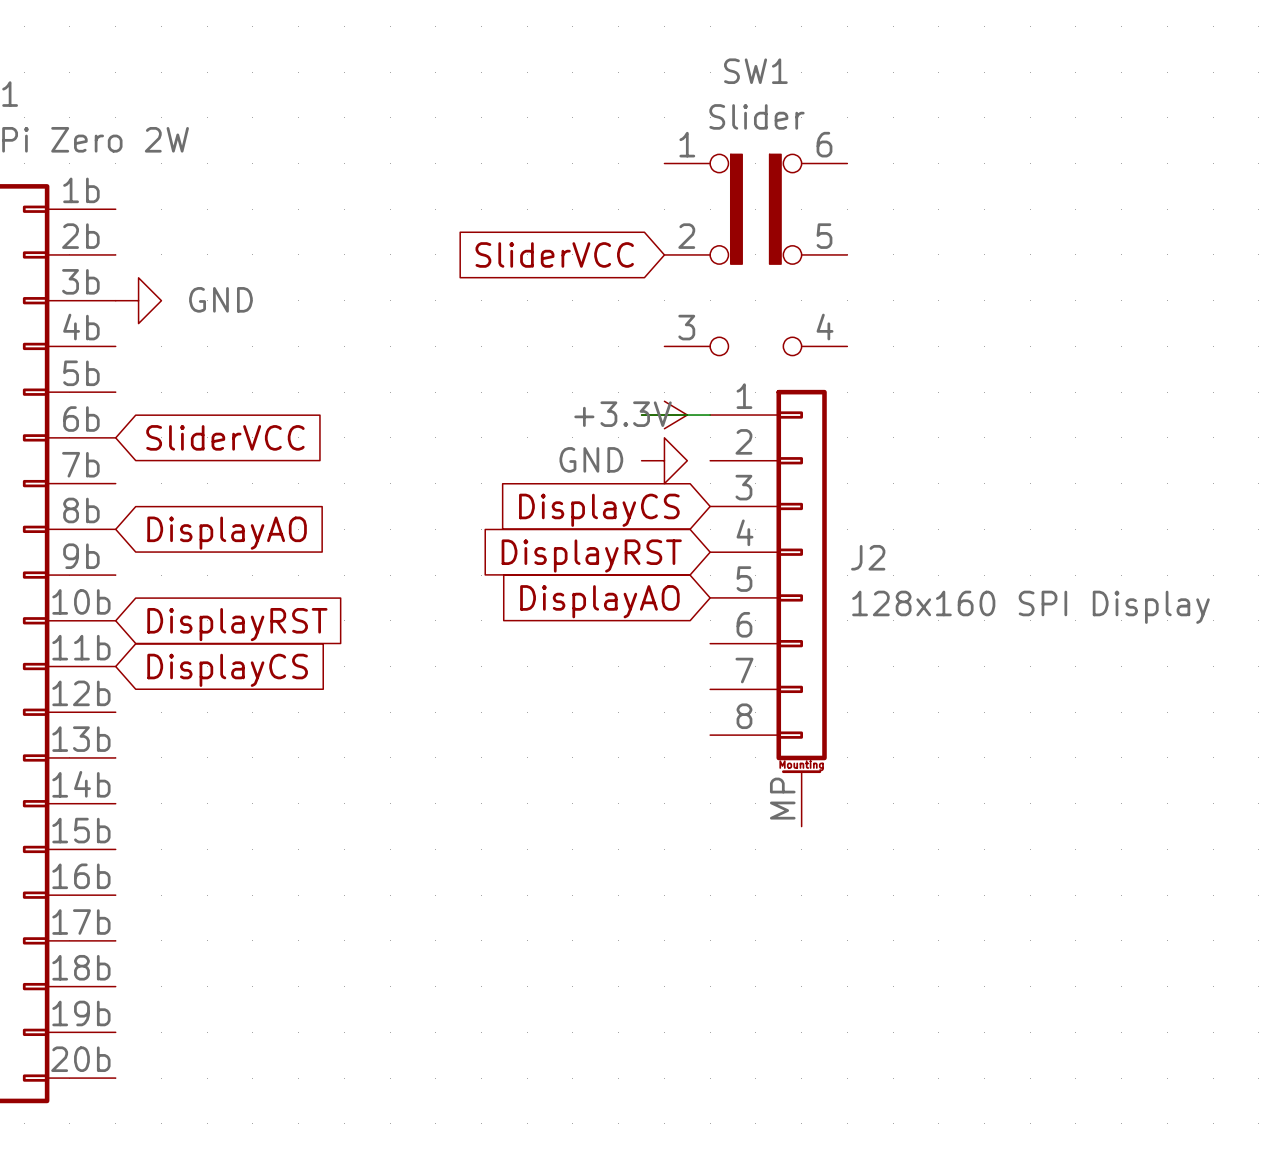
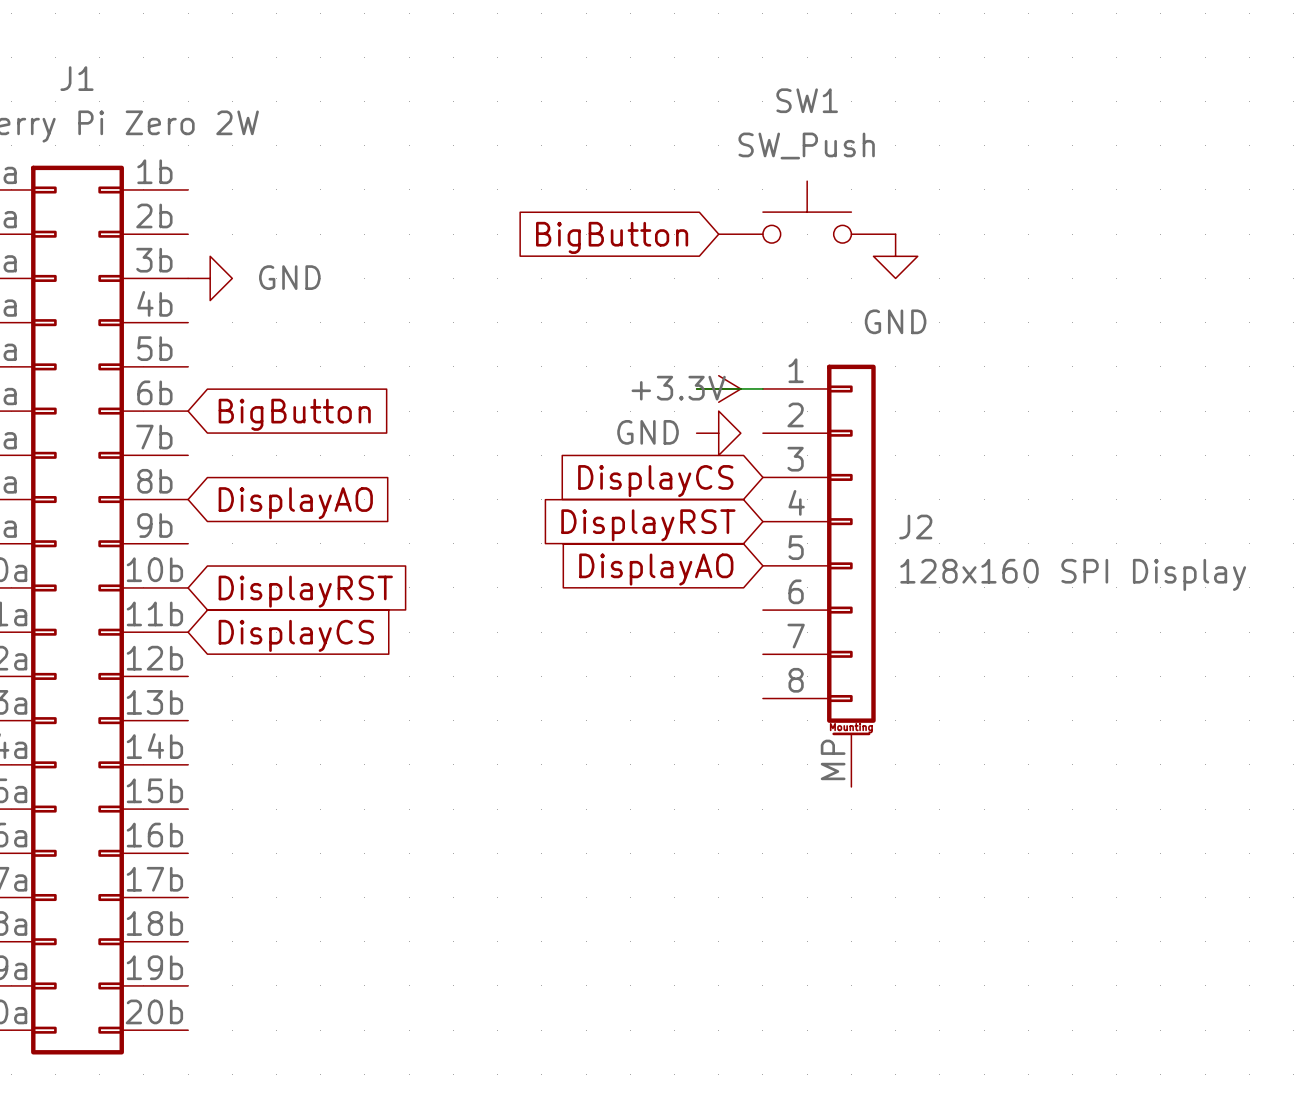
SW1 name position: SW1 (755, 71) -> SW1 (807, 100)
SW1 value: Slider (756, 116) -> SW_Push (806, 145)
SW1 symbol: [664, 154, 848, 356] -> [718, 181, 896, 244]
global label: SliderVCC (554, 254) -> BigButton (612, 237)
power symbol: none -> GND (895, 256)
global label: SliderVCC (225, 437) -> BigButton (294, 414)

